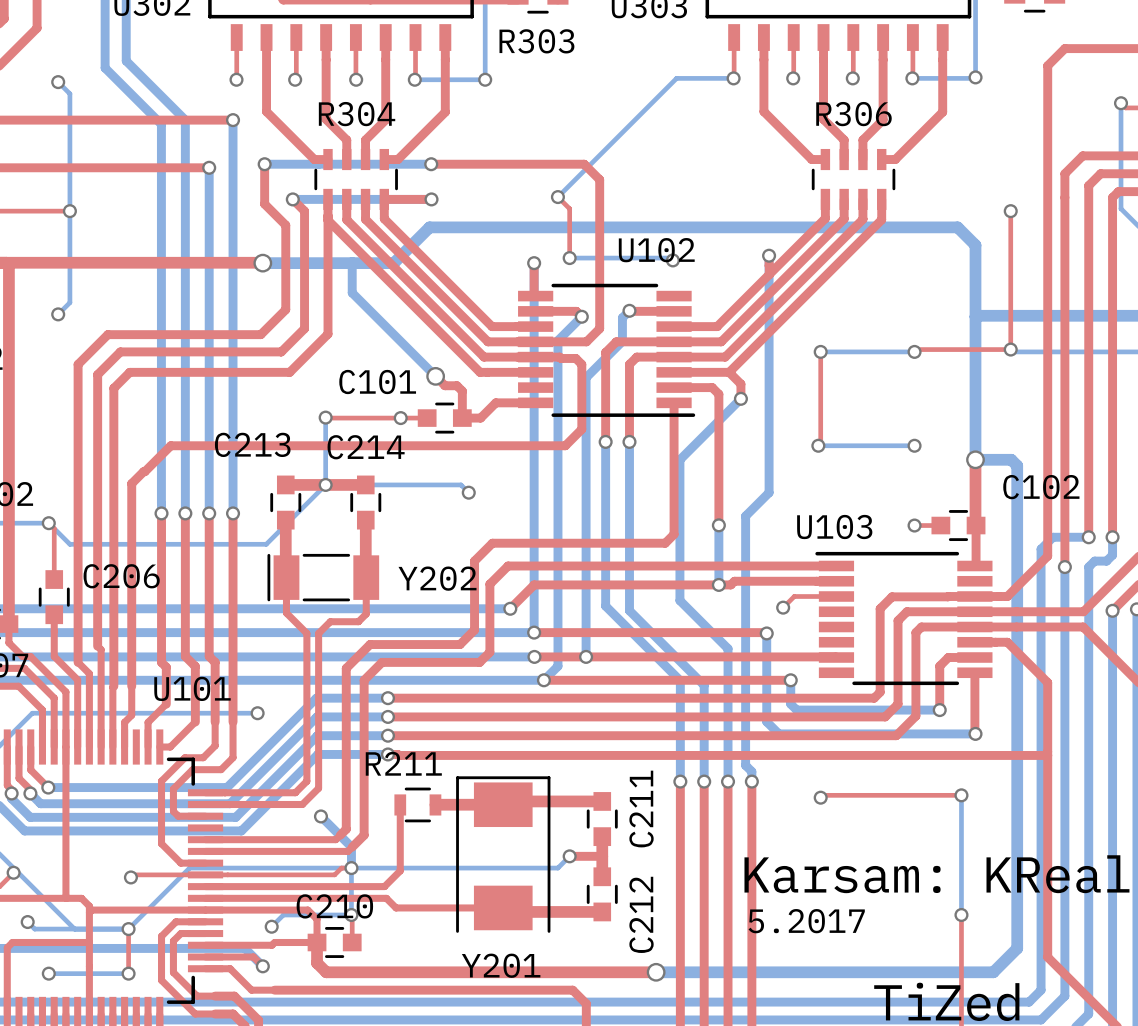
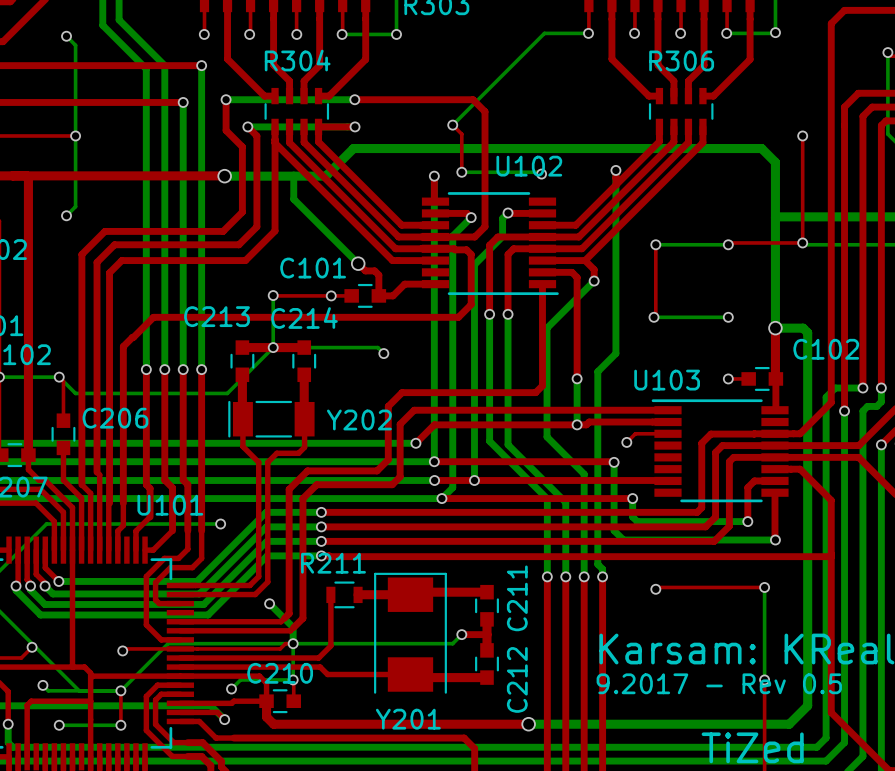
text: none -> 9.2017 - Rev 0.5 (719, 683)
text: 5.2017 (806, 921) -> none

